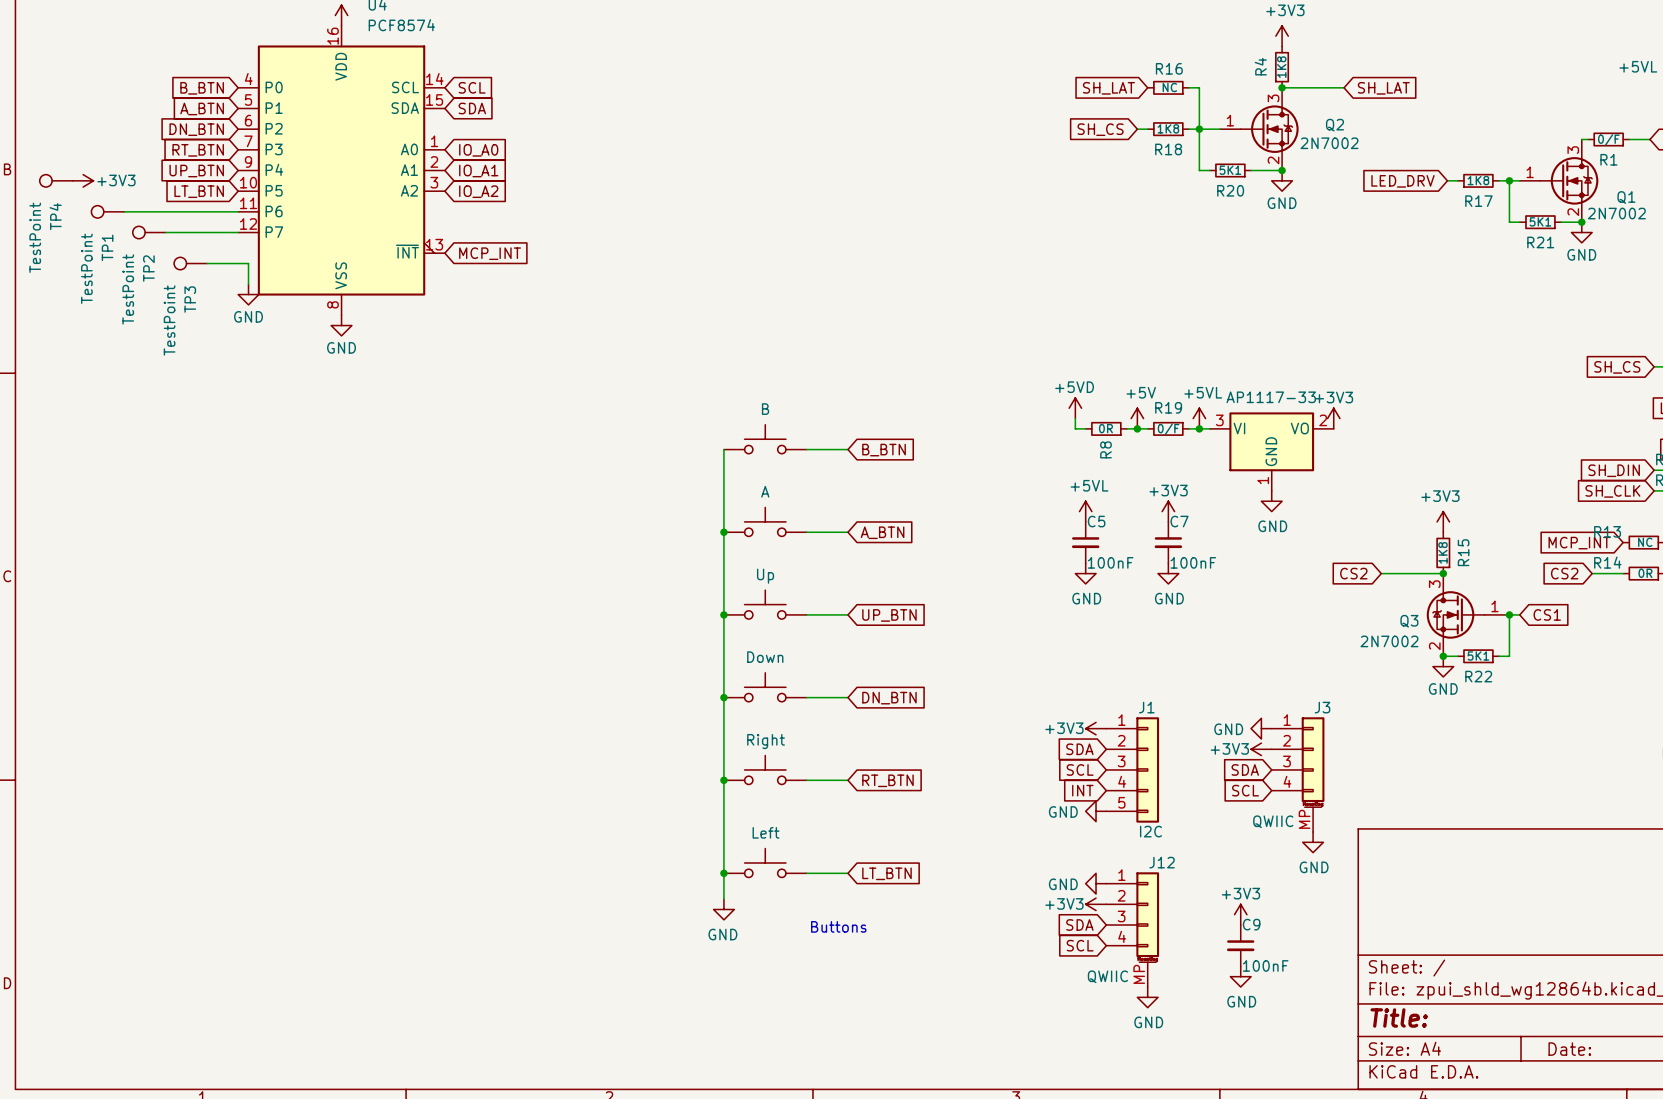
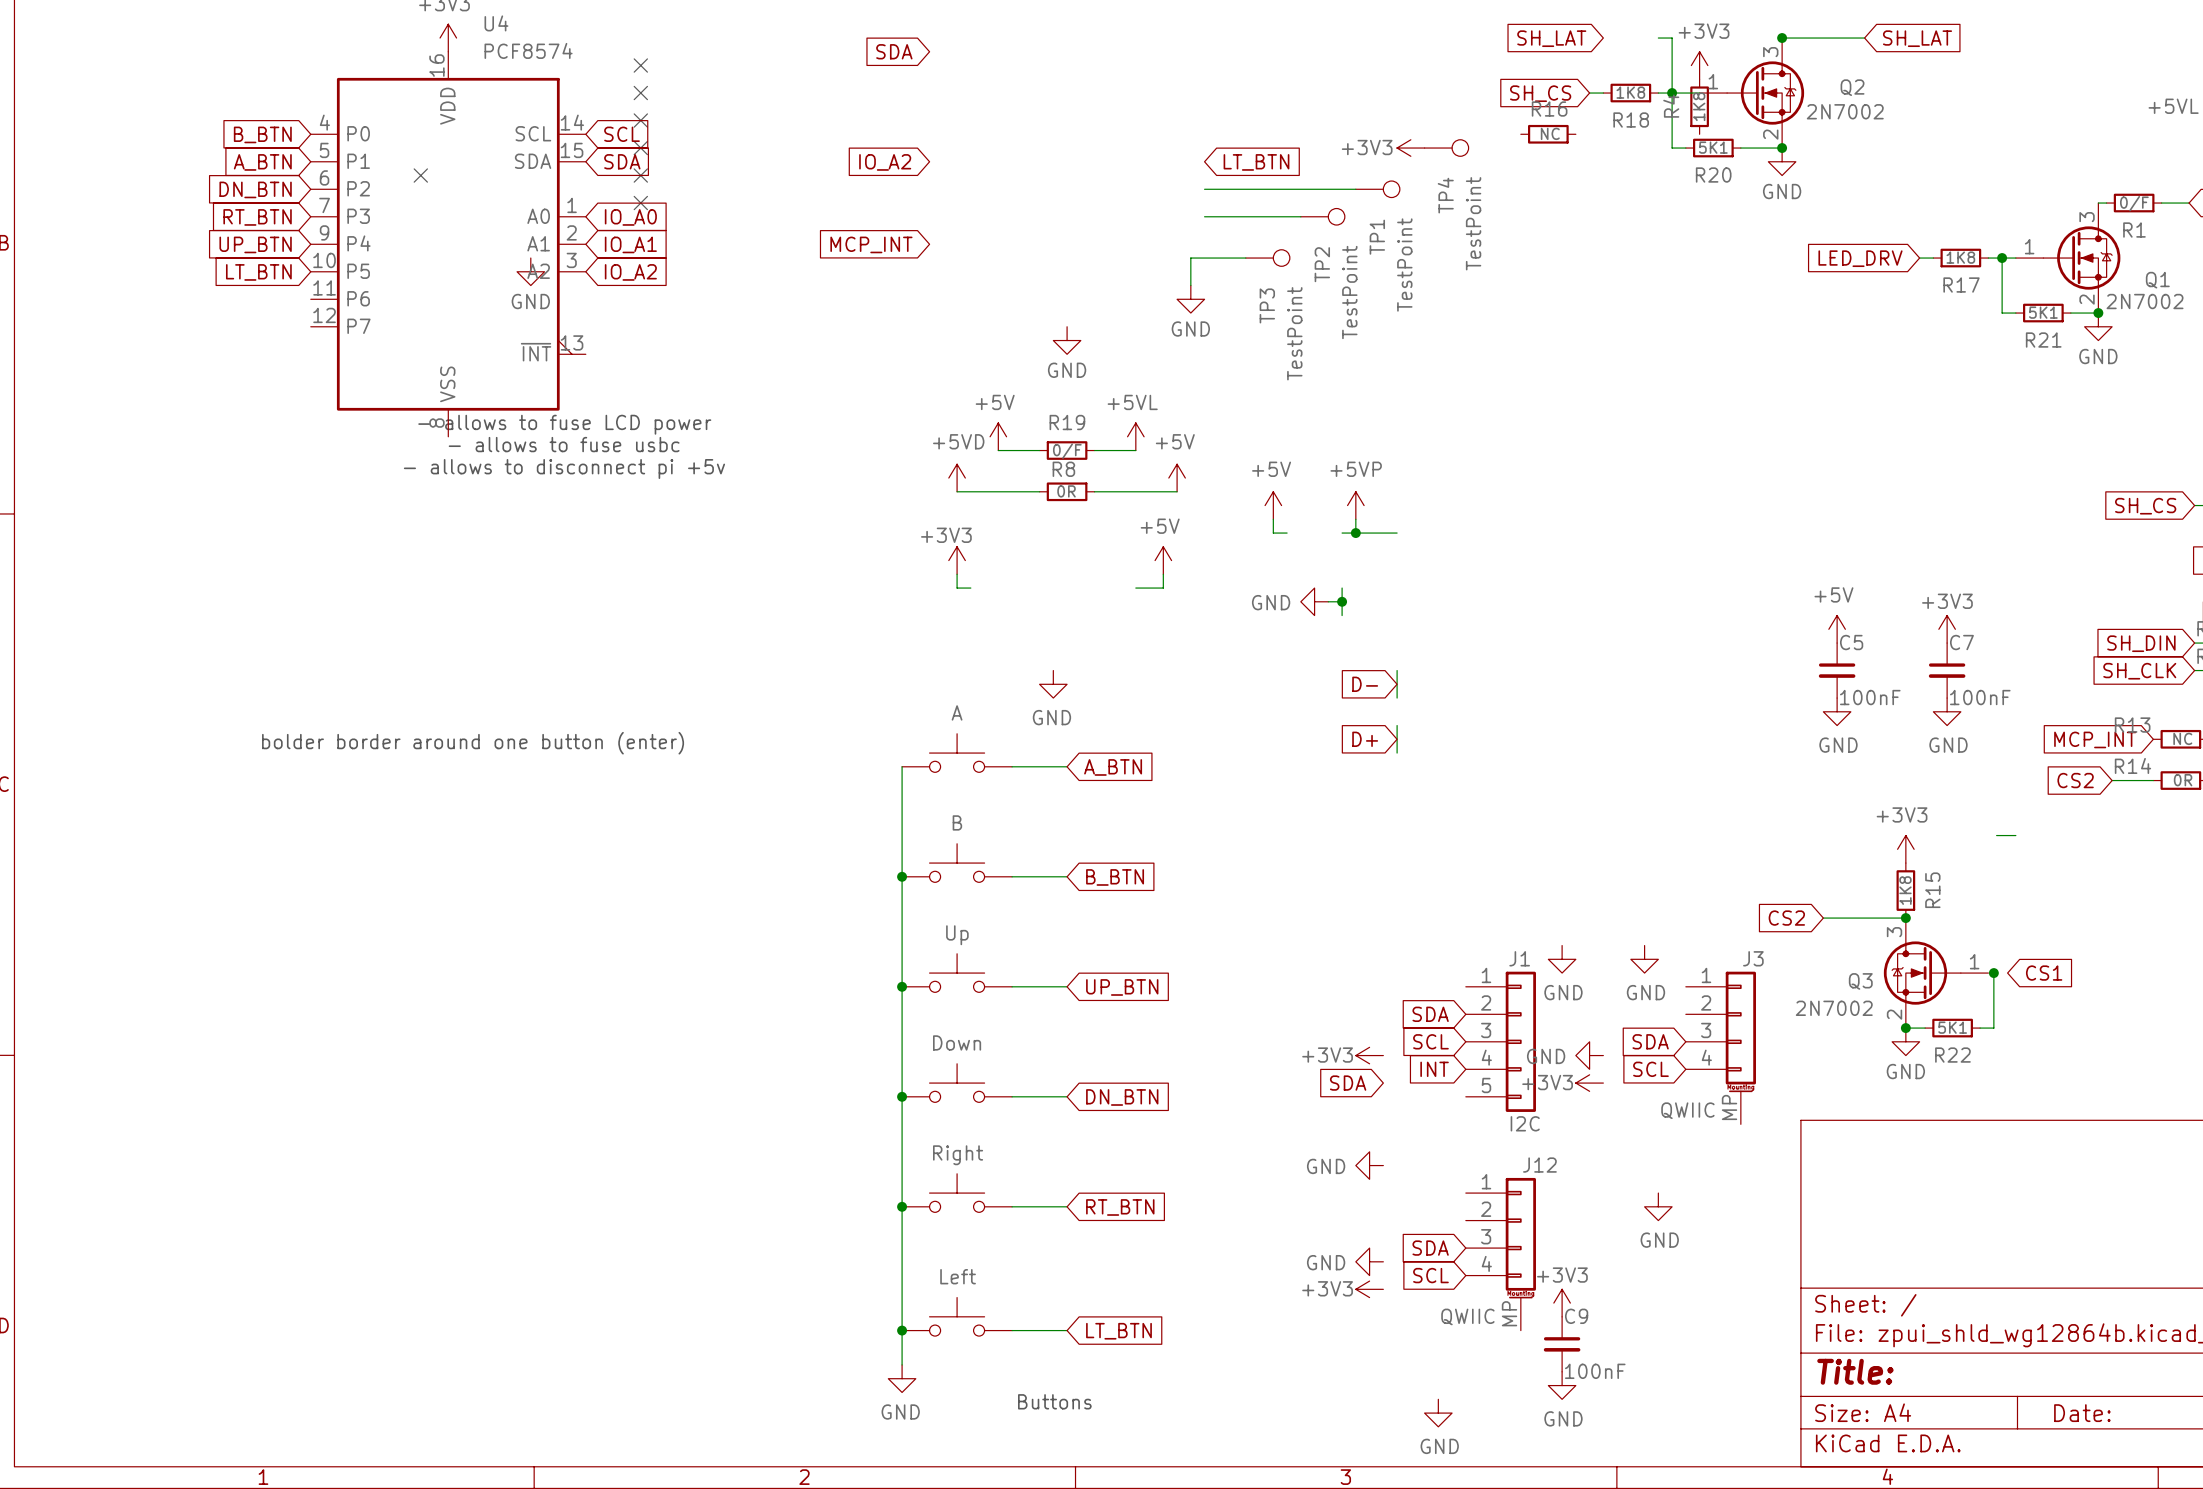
global label: none -> SH_LAT (1551, 38)
junction: none -> (1782, 38)
global label: none -> SH_LAT (1917, 38)
global label: none -> SDA (894, 51)
no-connect mark: none -> (640, 65)
no-connect mark: none -> (640, 93)
junction: none -> (1672, 93)
no-connect mark: none -> (640, 120)
wire: (1189, 87) (1199, 87) (1199, 170) (1209, 170) -> (1658, 38) (1672, 38) (1672, 148) (1685, 148)
wire: (1282, 87) (1344, 87) -> (1782, 38) (1864, 38)
junction: (1282, 87) -> none
global label: SH_LAT (1108, 88) -> none
global label: SH_LAT (1383, 88) -> none
no-connect mark: none -> (640, 148)
power symbol: none -> +3V3 (1410, 148)
junction: none -> (1782, 148)
global label: none -> IO_A2 (885, 162)
global label: none -> LT_BTN (1256, 162)
no-connect mark: none -> (420, 175)
no-connect mark: none -> (640, 175)
wire: none -> (1204, 189) (1355, 189)
global label position: SH_CS (1100, 129) -> SH_CS (1540, 93)
wire: (1137, 129) (1147, 129) -> (1589, 93) (1603, 93)
R18 position: (1168, 129) -> (1630, 93)
wire: (1189, 129) (1220, 129) -> (1658, 93) (1699, 93)
junction: (1199, 129) -> none
Q2 position: (1259, 129) -> (1751, 93)
no-connect mark: none -> (640, 203)
wire: none -> (1204, 216) (1300, 216)
R20 position: (1230, 170) -> (1713, 148)
wire: (1251, 170) (1282, 170) -> (1740, 148) (1782, 148)
junction: (1282, 170) -> none
global label: none -> MCP_INT (871, 244)
TP4 rotation: 0° (45, 180) -> 180° (1460, 148)
TP4 position: (56, 180) -> (1446, 148)
power symbol: +3V3 (83, 180) -> none
wire: none -> (1245, 258) (1190, 258) (1190, 285)
power symbol position: GND (1282, 180) -> GND (1782, 161)
power symbol: none -> GND (530, 271)
TP1 rotation: 0° (97, 211) -> 180° (1391, 189)
TP1 position: (107, 211) -> (1377, 189)
wire: (124, 211) (238, 211) -> none
power symbol: none -> GND (1190, 299)
TP2 rotation: 0° (138, 232) -> 180° (1336, 216)
TP2 position: (149, 232) -> (1322, 216)
wire: (165, 232) (238, 232) -> none
TP4 value position: TestPoint (35, 237) -> TestPoint (1473, 223)
power symbol: none -> GND (1067, 340)
global label: MCP_INT (490, 253) -> none
TP3 rotation: 0° (180, 263) -> 180° (1281, 258)
TP3 position: (190, 263) -> (1267, 258)
wire: (207, 263) (248, 263) (248, 284) -> none
TP1 value position: TestPoint (86, 268) -> TestPoint (1404, 265)
TP2 value position: TestPoint (128, 289) -> TestPoint (1349, 292)
power symbol: GND (248, 294) -> none
text: none -> - allows to fuse LCD power (564, 424)
power symbol: none -> +5V (998, 436)
power symbol: none -> +5VL (1135, 436)
TP3 value position: TestPoint (169, 320) -> TestPoint (1294, 333)
text: none -> - allows to fuse usbc (564, 444)
power symbol: GND (341, 325) -> none
wire: none -> (998, 450) (1039, 450)
wire: none -> (1094, 450) (1135, 450)
text: none -> - allows to disconnect pi +5v (564, 469)
power symbol: none -> +5VD (957, 478)
power symbol: none -> +5V (1177, 478)
wire: none -> (957, 491) (1039, 491)
wire: none -> (1094, 491) (1177, 491)
power symbol: none -> +5V (1273, 505)
power symbol: none -> +5VP (1355, 505)
wire: none -> (1355, 519) (1355, 533)
wire: none -> (1342, 533) (1397, 533)
junction: none -> (1355, 533)
power symbol: none -> +3V3 (957, 560)
power symbol: none -> +5V (1163, 560)
power symbol: +5VD (1075, 408) -> none
wire: none -> (957, 574) (957, 588) (970, 588)
wire: none -> (1163, 574) (1163, 588) (1135, 588)
wire: (1075, 418) (1075, 428) (1085, 428) -> (1273, 519) (1273, 533) (1287, 533)
power symbol: +5V (1137, 418) -> none
power symbol: +5VL (1199, 418) -> none
power symbol: +3V3 (1333, 418) -> none
wire: none -> (1342, 588) (1342, 615)
R8 position: (1106, 428) -> (1067, 491)
wire: (1127, 428) (1147, 428) -> none
junction: (1137, 428) -> none
R19 position: (1168, 428) -> (1067, 450)
wire: (1189, 428) (1209, 428) -> none
junction: (1199, 428) -> none
part position: (765, 439) -> (957, 863)
power symbol: none -> GND (1314, 601)
wire: none -> (1328, 601) (1342, 601)
junction: none -> (1342, 601)
wire: (723, 449) (723, 899) -> (902, 766) (902, 1364)
wire: (806, 449) (847, 449) -> (1012, 766) (1067, 766)
R8 name rotation: 0° (1105, 449) -> 90° clockwise (1063, 469)
R8 name position: R8 (1105, 449) -> R8 (1063, 469)
global label position: B_BTN (884, 450) -> B_BTN (1115, 877)
part: AP1117-33 (1271, 451) -> none
power symbol: none -> +5V (1837, 629)
power symbol: none -> +3V3 (1947, 629)
wire: none -> (1397, 670) (1397, 698)
power symbol: none -> GND (1053, 684)
global label: none -> D- (1365, 684)
power symbol: GND (1271, 501) -> none
power symbol: +5VL (1085, 511) -> none
power symbol: +3V3 (1168, 511) -> none
part position: (765, 521) -> (957, 753)
power symbol: none -> GND (1837, 711)
power symbol: +3V3 (1443, 521) -> none
power symbol: none -> GND (1947, 711)
junction: (723, 532) -> none
wire: (806, 532) (847, 532) -> (1012, 876) (1067, 876)
global label position: A_BTN (882, 532) -> A_BTN (1113, 767)
wire: none -> (1397, 725) (1397, 753)
global label: none -> D+ (1365, 739)
C5 position: (1085, 542) -> (1837, 670)
C7 position: (1168, 542) -> (1947, 670)
text: none -> bolder border around one button (enter) (473, 743)
R15 position: (1443, 552) -> (1905, 890)
power symbol: GND (1085, 573) -> none
power symbol: GND (1168, 573) -> none
global label position: CS2 (1353, 573) -> CS2 (1786, 918)
wire: (1381, 573) (1443, 573) -> (1823, 918) (1905, 918)
junction: (1443, 573) -> none
part position: (765, 604) -> (957, 973)
junction: (723, 614) -> none
wire: (806, 614) (847, 614) -> (1012, 986) (1067, 986)
Q3 position: (1466, 614) -> (1936, 973)
wire: (1509, 614) (1509, 656) (1499, 656) -> (1993, 973) (1993, 1028) (1980, 1028)
junction: (1509, 614) -> none
global label position: CS1 (1547, 614) -> CS1 (2044, 973)
global label position: UP_BTN (889, 615) -> UP_BTN (1122, 987)
power symbol: none -> +3V3 (1905, 849)
junction: none -> (902, 876)
wire: (1443, 656) (1457, 656) -> (1905, 1028) (1925, 1028)
junction position: (1443, 656) -> (1905, 918)
R22 position: (1478, 656) -> (1952, 1028)
power symbol: GND (1443, 666) -> none
part position: (765, 687) -> (957, 1083)
junction: (723, 697) -> none
wire: (806, 697) (847, 697) -> (1012, 1096) (1067, 1096)
global label position: DN_BTN (889, 698) -> DN_BTN (1122, 1097)
power symbol: none -> GND (1562, 959)
junction: none -> (1993, 973)
junction: none -> (902, 986)
power symbol: +3V3 (1096, 728) -> none
power symbol rotation: 0° (1261, 728) -> 90° counterclockwise (1644, 959)
power symbol position: GND (1261, 728) -> GND (1644, 959)
power symbol: +3V3 (1261, 749) -> none
junction: none -> (1905, 1028)
part position: (765, 769) -> (957, 1193)
power symbol: none -> GND (1905, 1041)
junction: (723, 780) -> none
wire: (806, 780) (847, 780) -> (1012, 1206) (1067, 1206)
global label position: RT_BTN (887, 780) -> RT_BTN (1120, 1207)
power symbol: none -> +3V3 (1369, 1055)
power symbol: none -> GND (1589, 1055)
global label: none -> SDA (1348, 1083)
power symbol: none -> +3V3 (1589, 1083)
junction: none -> (902, 1096)
power symbol: GND (1096, 811) -> none
power symbol: GND (1313, 842) -> none
part position: (765, 862) -> (957, 1316)
power symbol: none -> GND (1369, 1165)
junction: (723, 873) -> none
wire: (806, 873) (847, 873) -> (1012, 1330) (1067, 1330)
global label position: LT_BTN (886, 873) -> LT_BTN (1118, 1331)
power symbol: GND (1096, 883) -> none
junction: none -> (902, 1206)
power symbol: none -> GND (1658, 1206)
power symbol: +3V3 (1096, 904) -> none
power symbol position: GND (723, 909) -> GND (902, 1378)
power symbol: +3V3 (1240, 914) -> none
text position: Buttons (838, 926) -> Buttons (1054, 1401)
power symbol: none -> GND (1369, 1261)
C9 position: (1240, 945) -> (1562, 1344)
power symbol: none -> +3V3 (1369, 1289)
power symbol: none -> +3V3 (1562, 1303)
power symbol: GND (1240, 976) -> none
junction: none -> (902, 1330)
power symbol: GND (1147, 997) -> none
power symbol: none -> GND (1562, 1385)
power symbol: none -> GND (1438, 1413)

